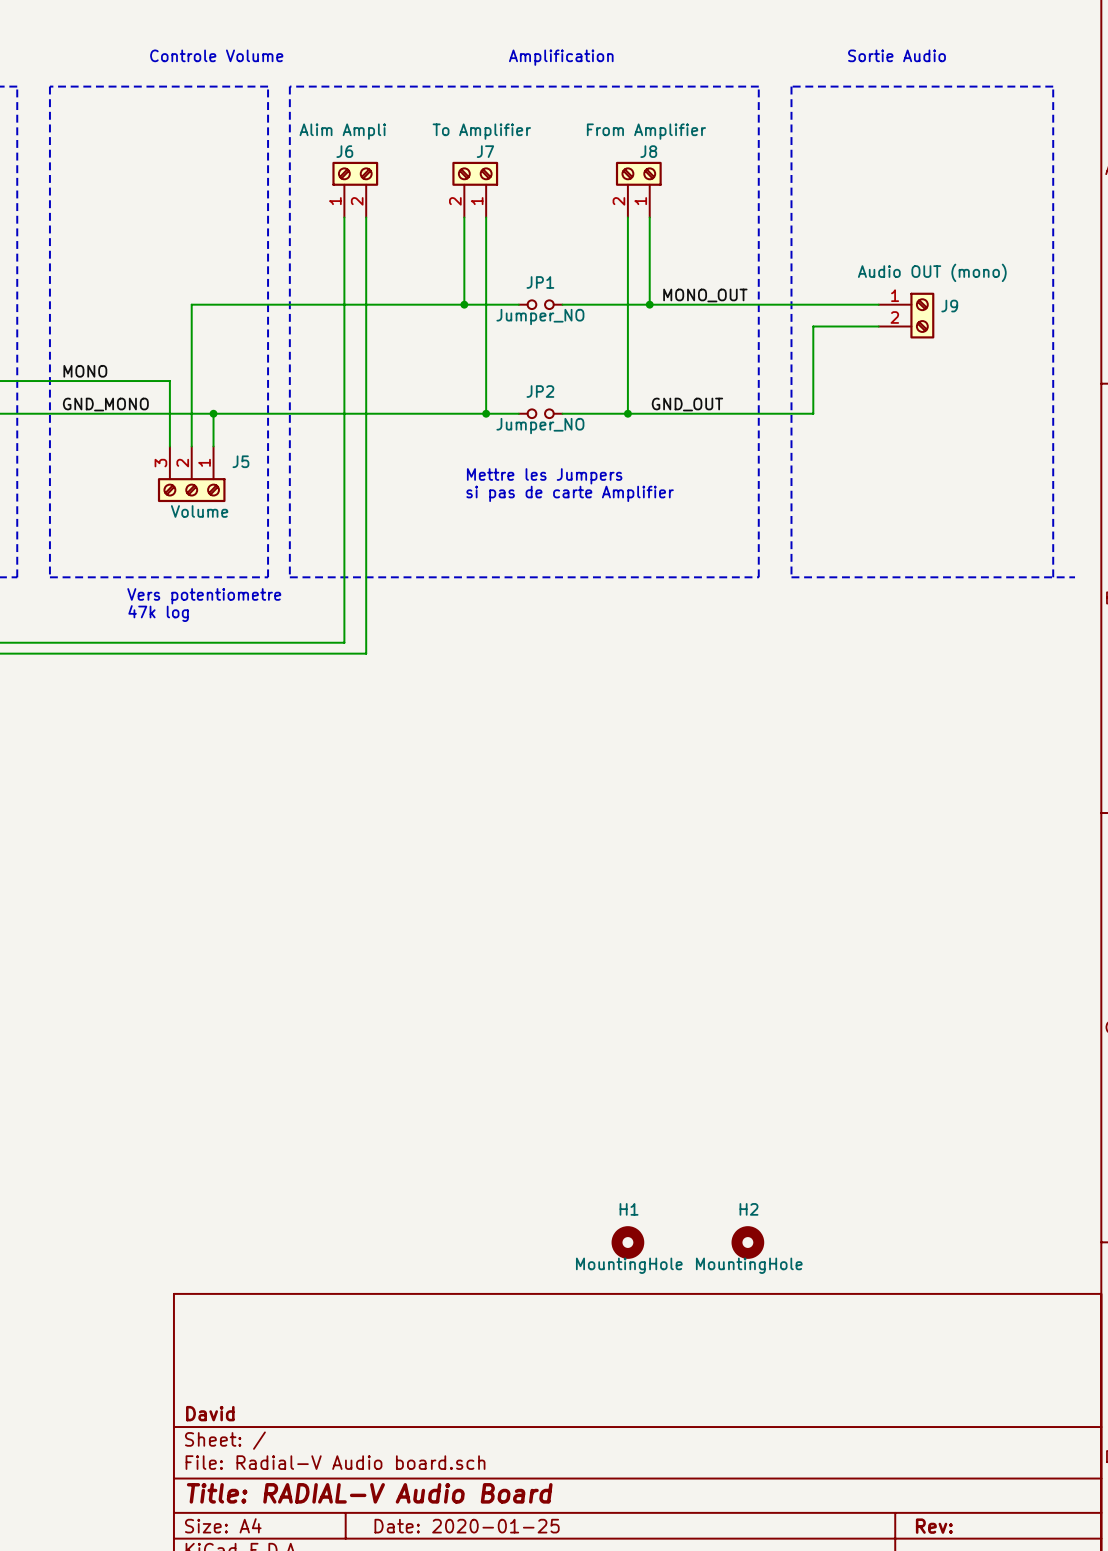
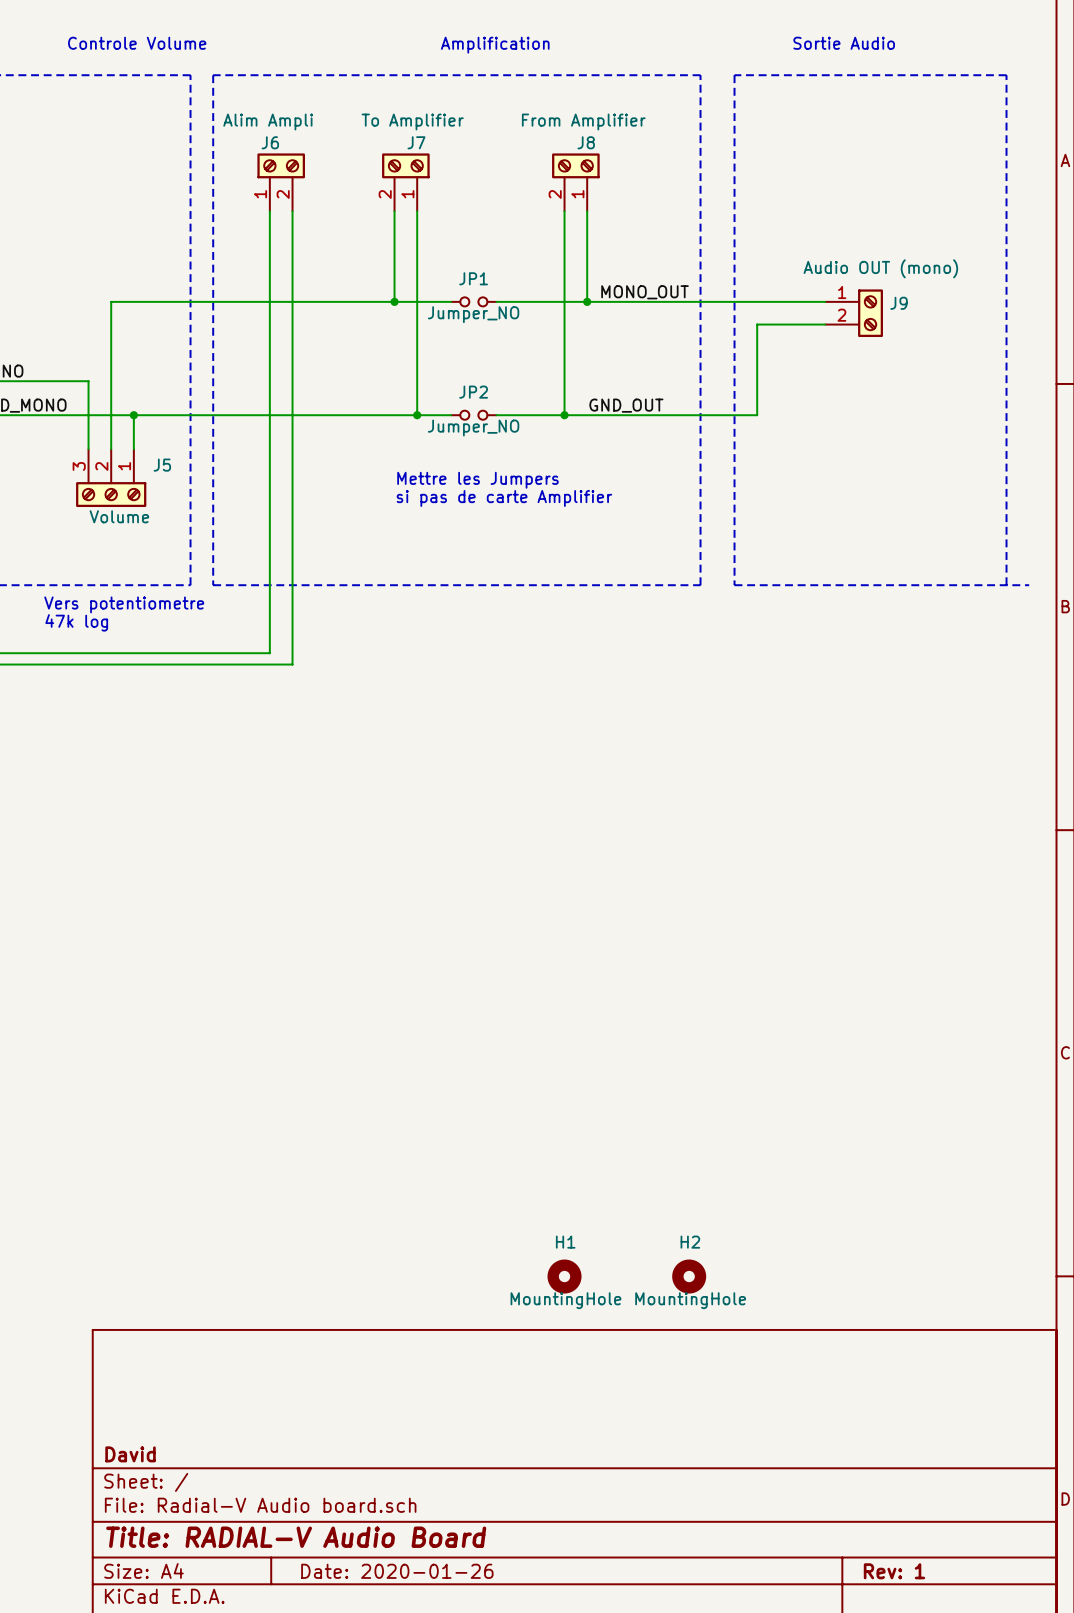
title block: Date: 2020-01-25 (467, 1526) -> Date: 2020-01-26 (397, 1571)
title block: Rev: (934, 1526) -> Rev: 1 (894, 1571)

